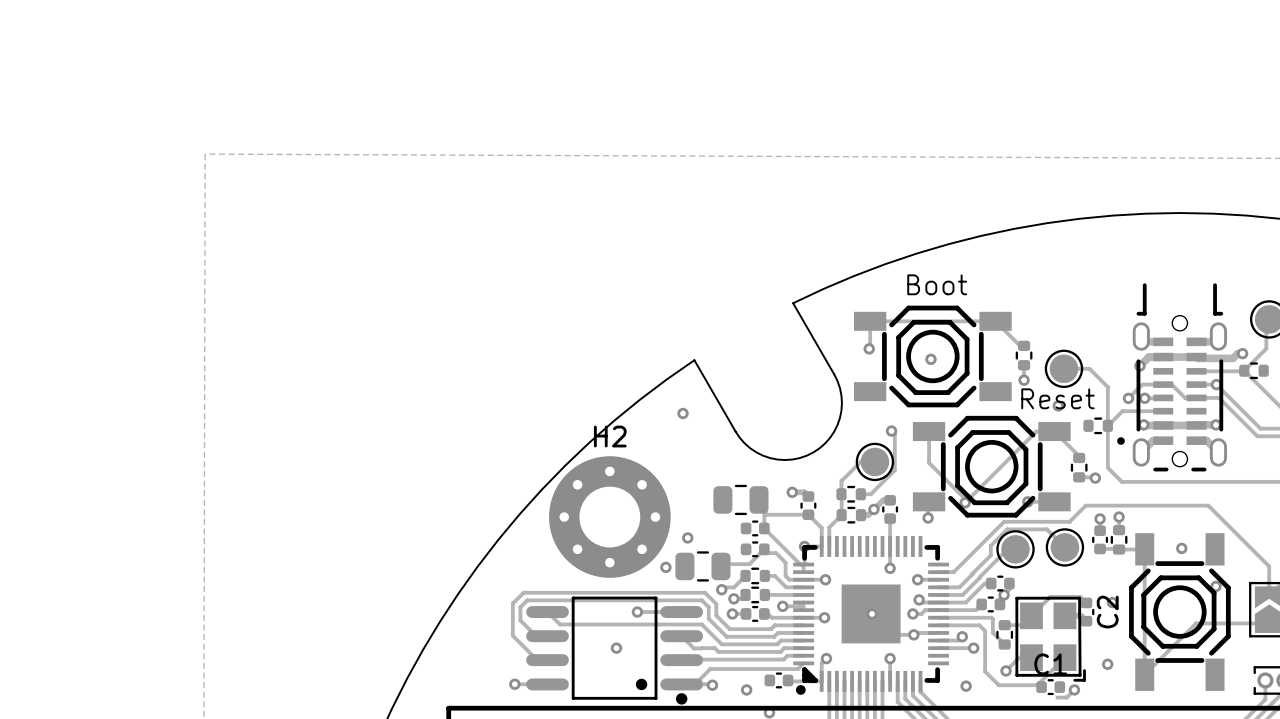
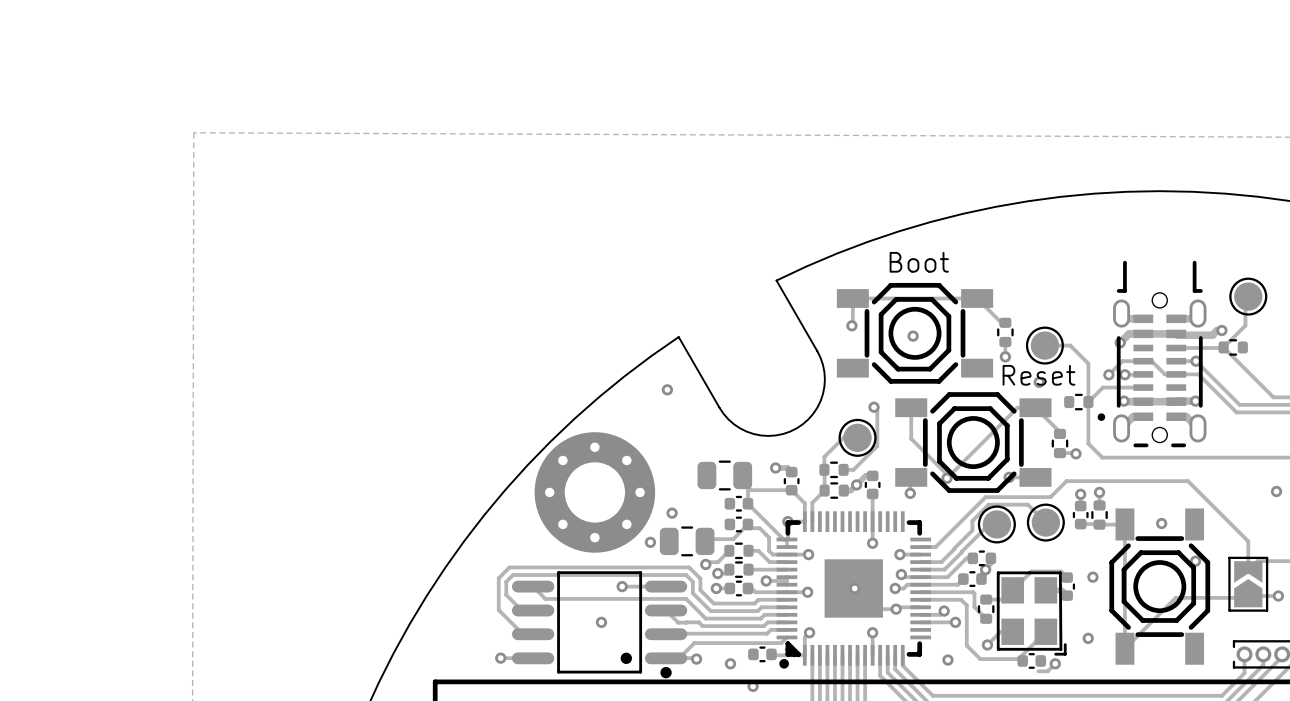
H2 name: H2 (610, 436) -> none
C2 name: C2 (1107, 612) -> none
C1 name: C1 (1050, 664) -> none

